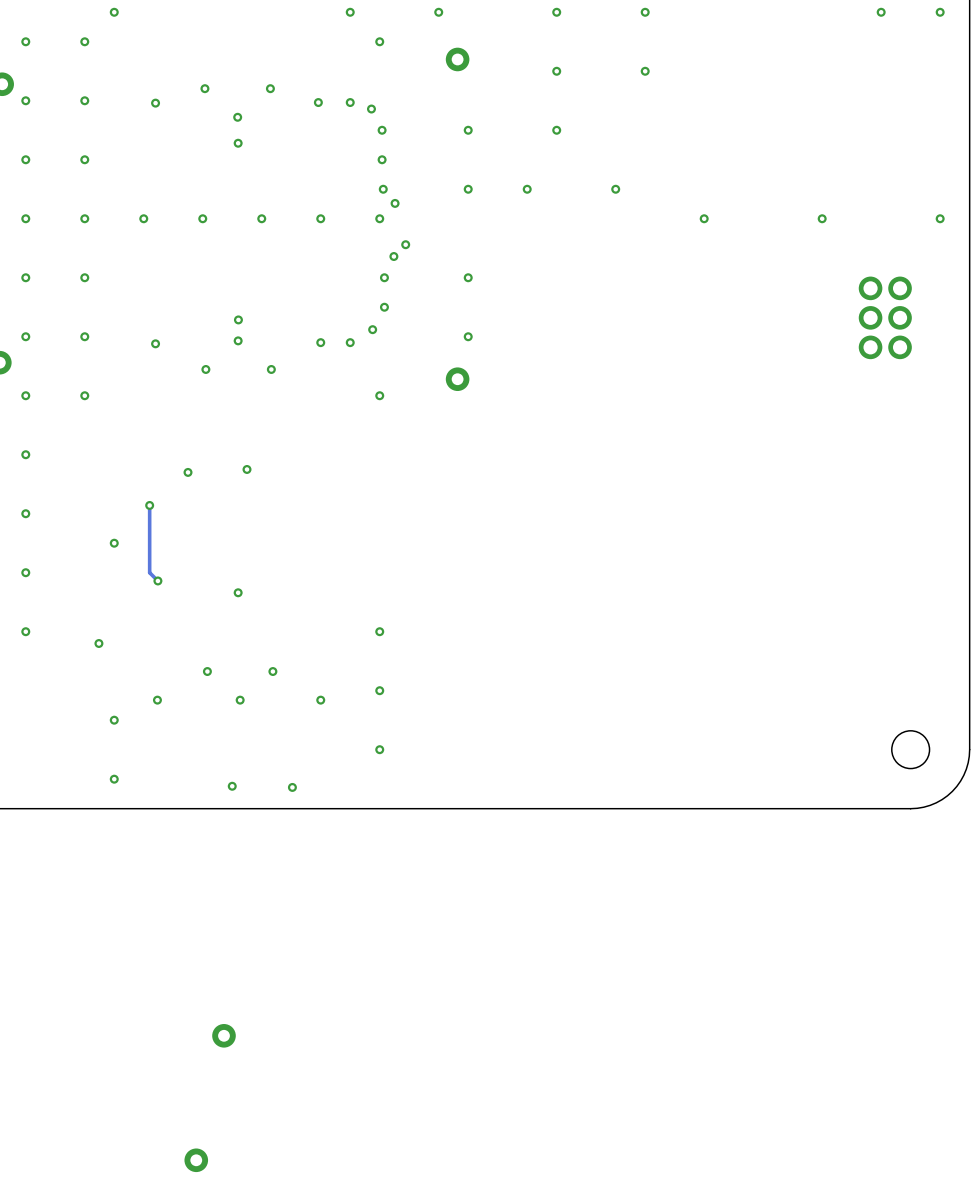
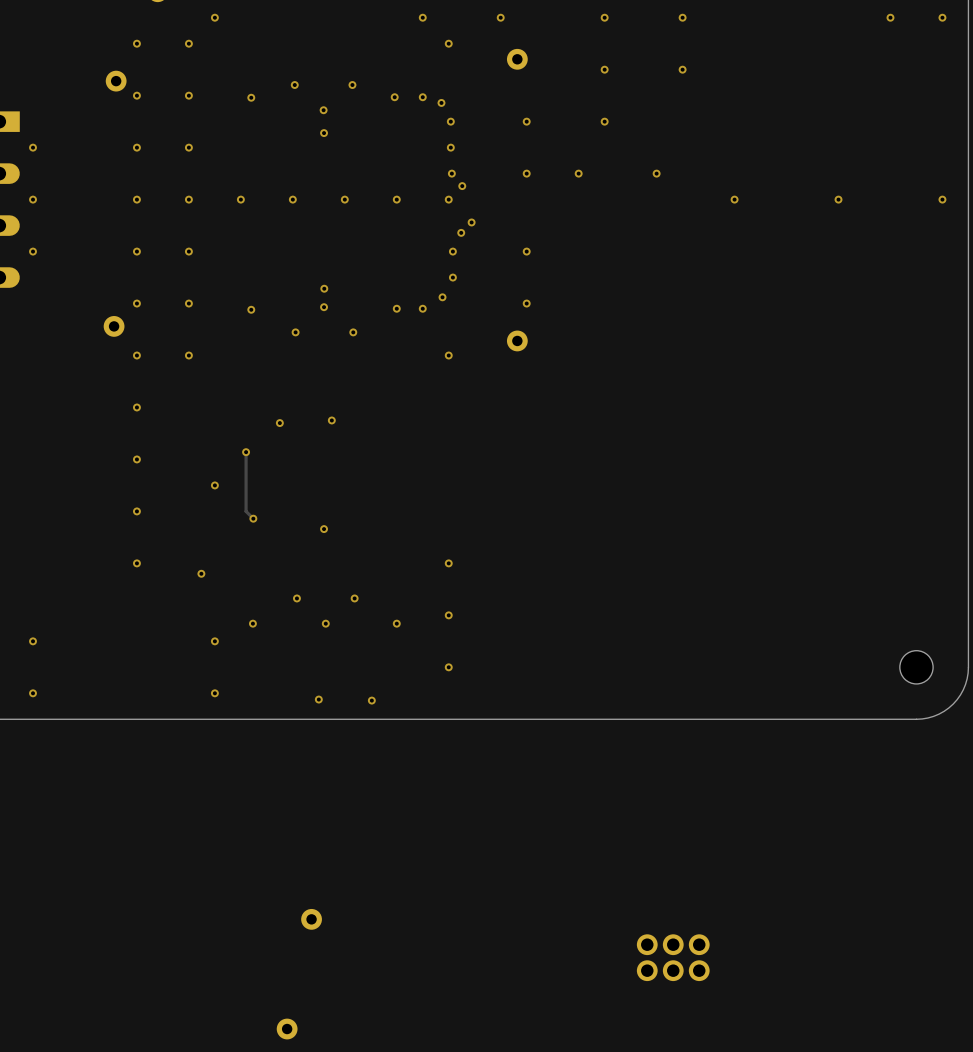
part: (885, 317) -> none
part: none -> (673, 957)

